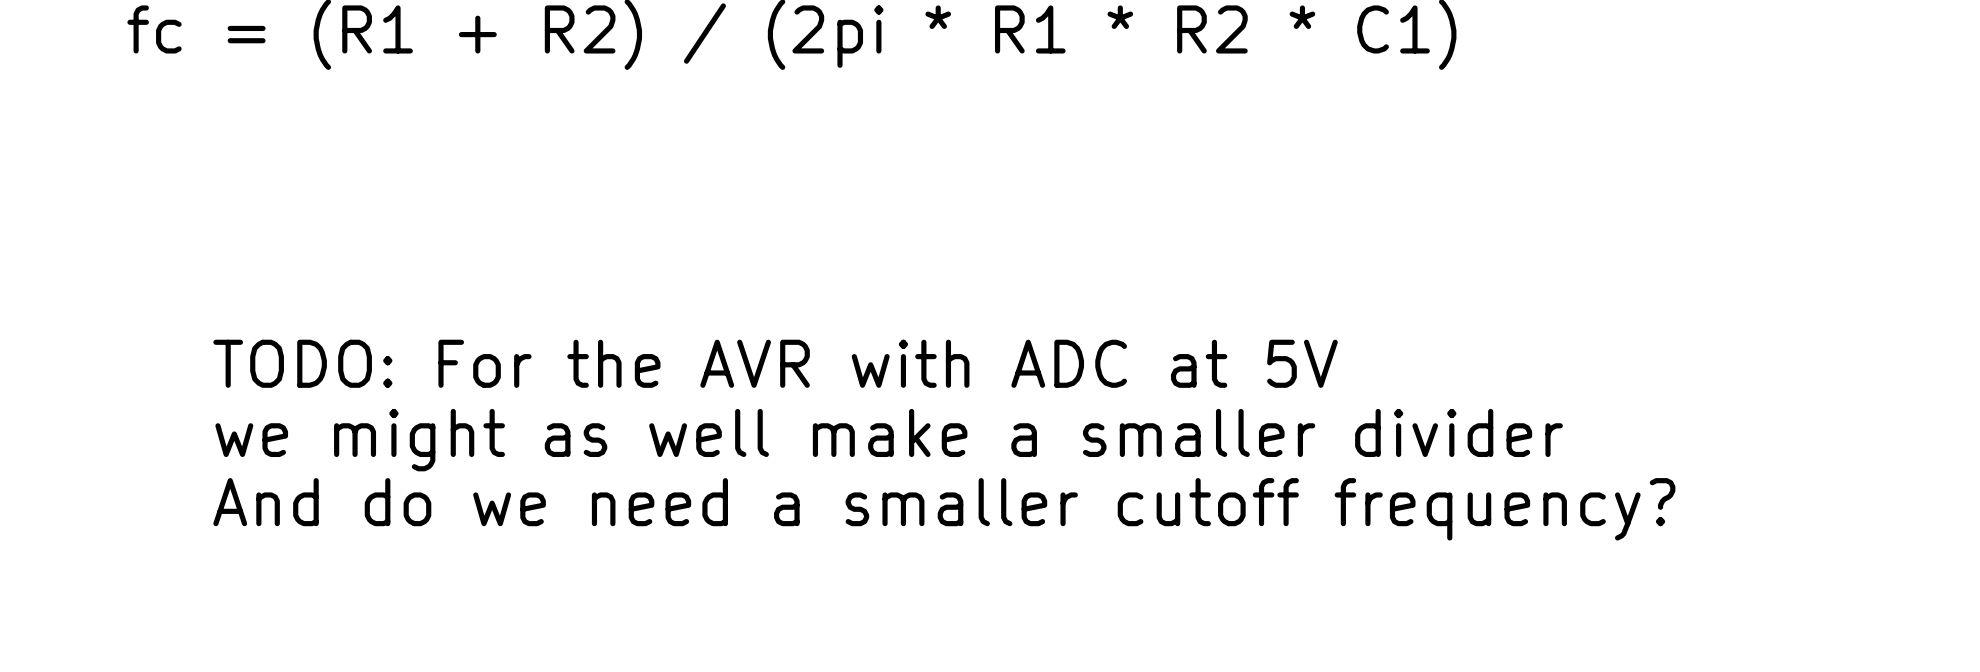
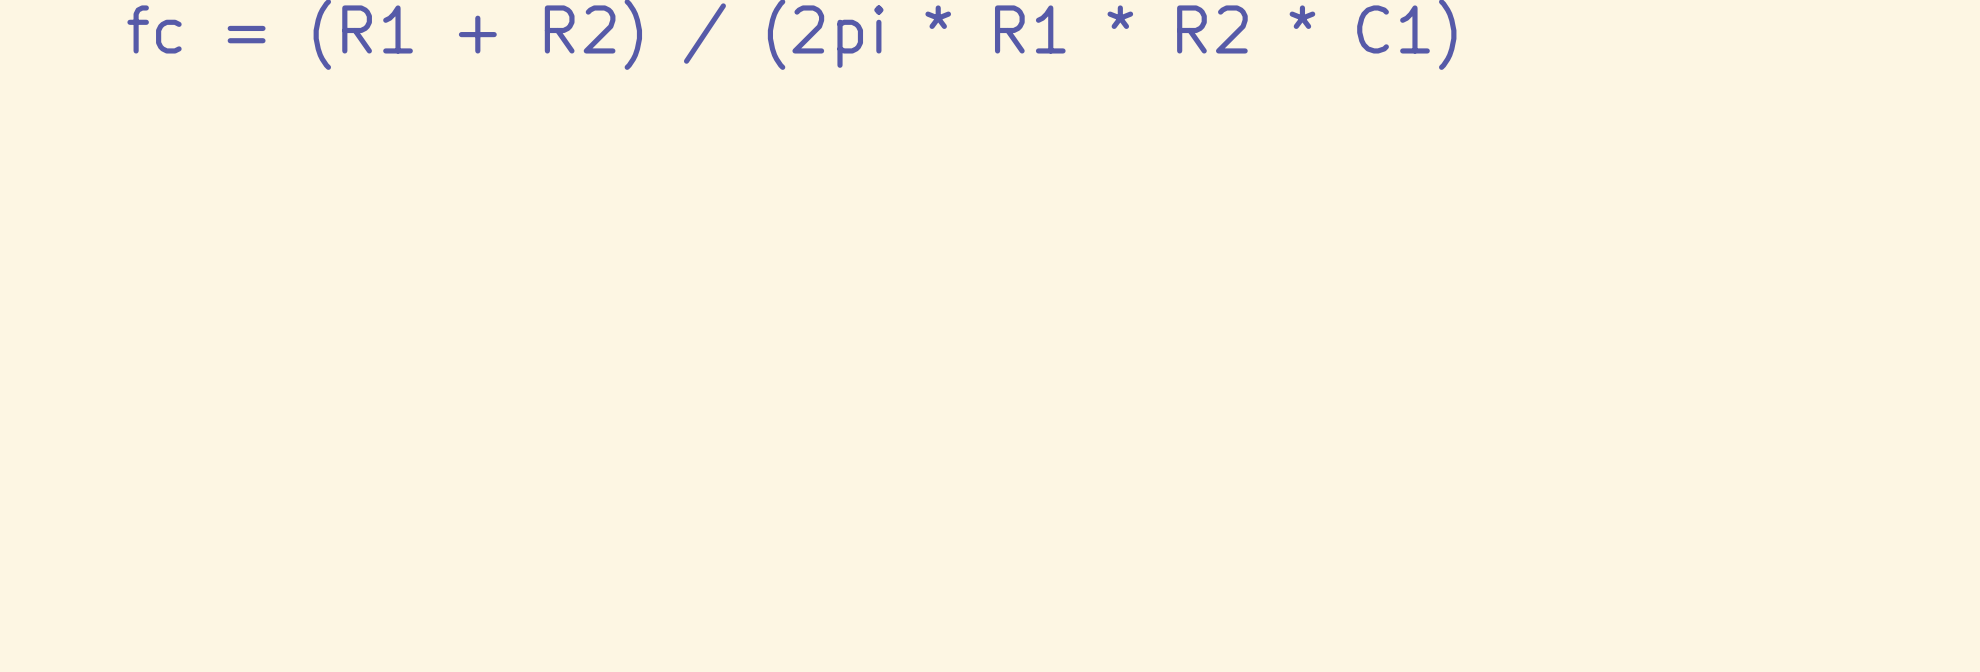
text: TODO: For the AVR with ADC at 5V (775, 363) -> none
text: we might as well make a smaller divider (889, 440) -> none
text: And do we need a smaller cutoff frequency? (944, 509) -> none

